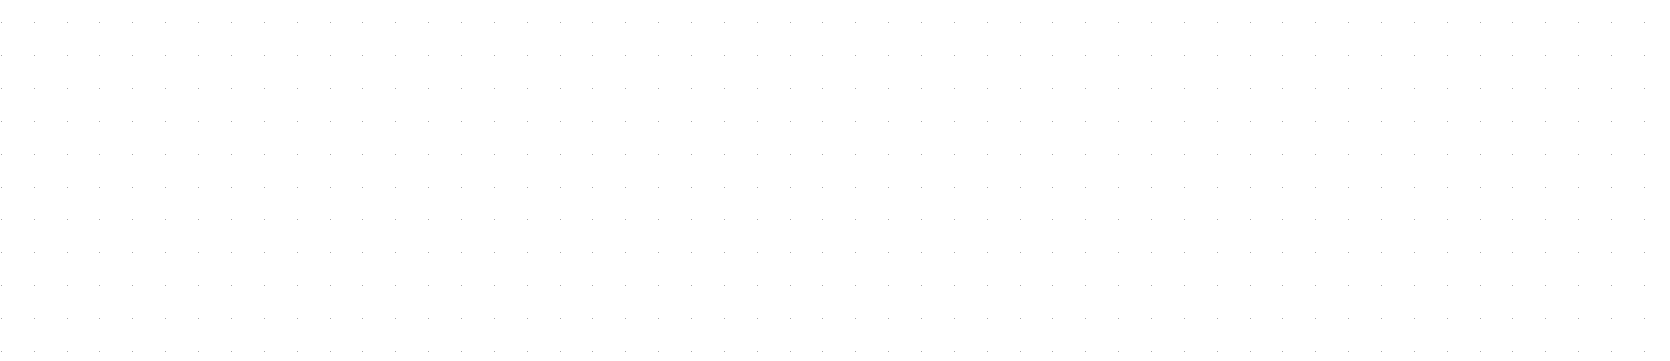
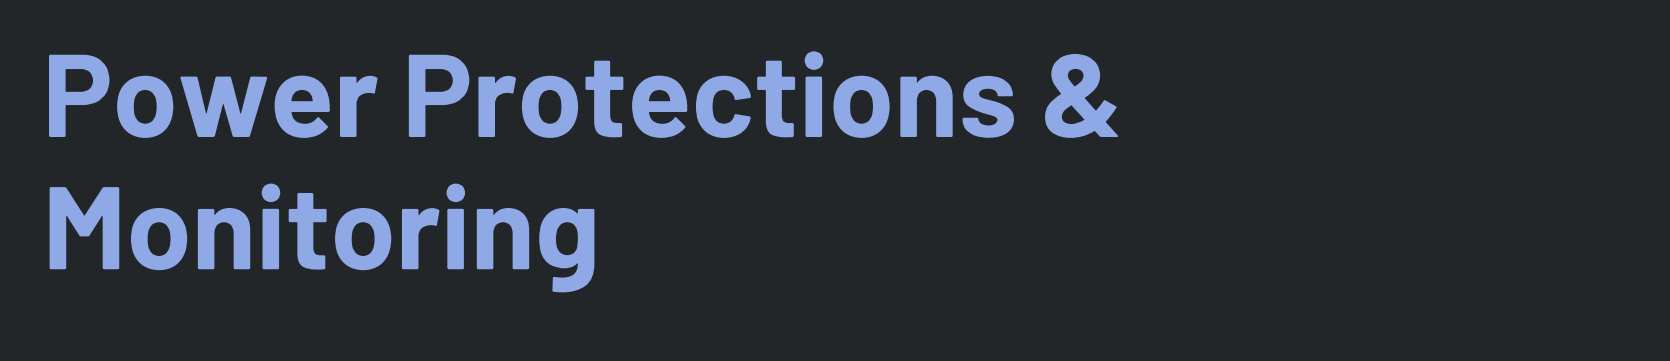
text: none -> Power Protections & (583, 94)
text: none -> Monitoring (322, 237)

